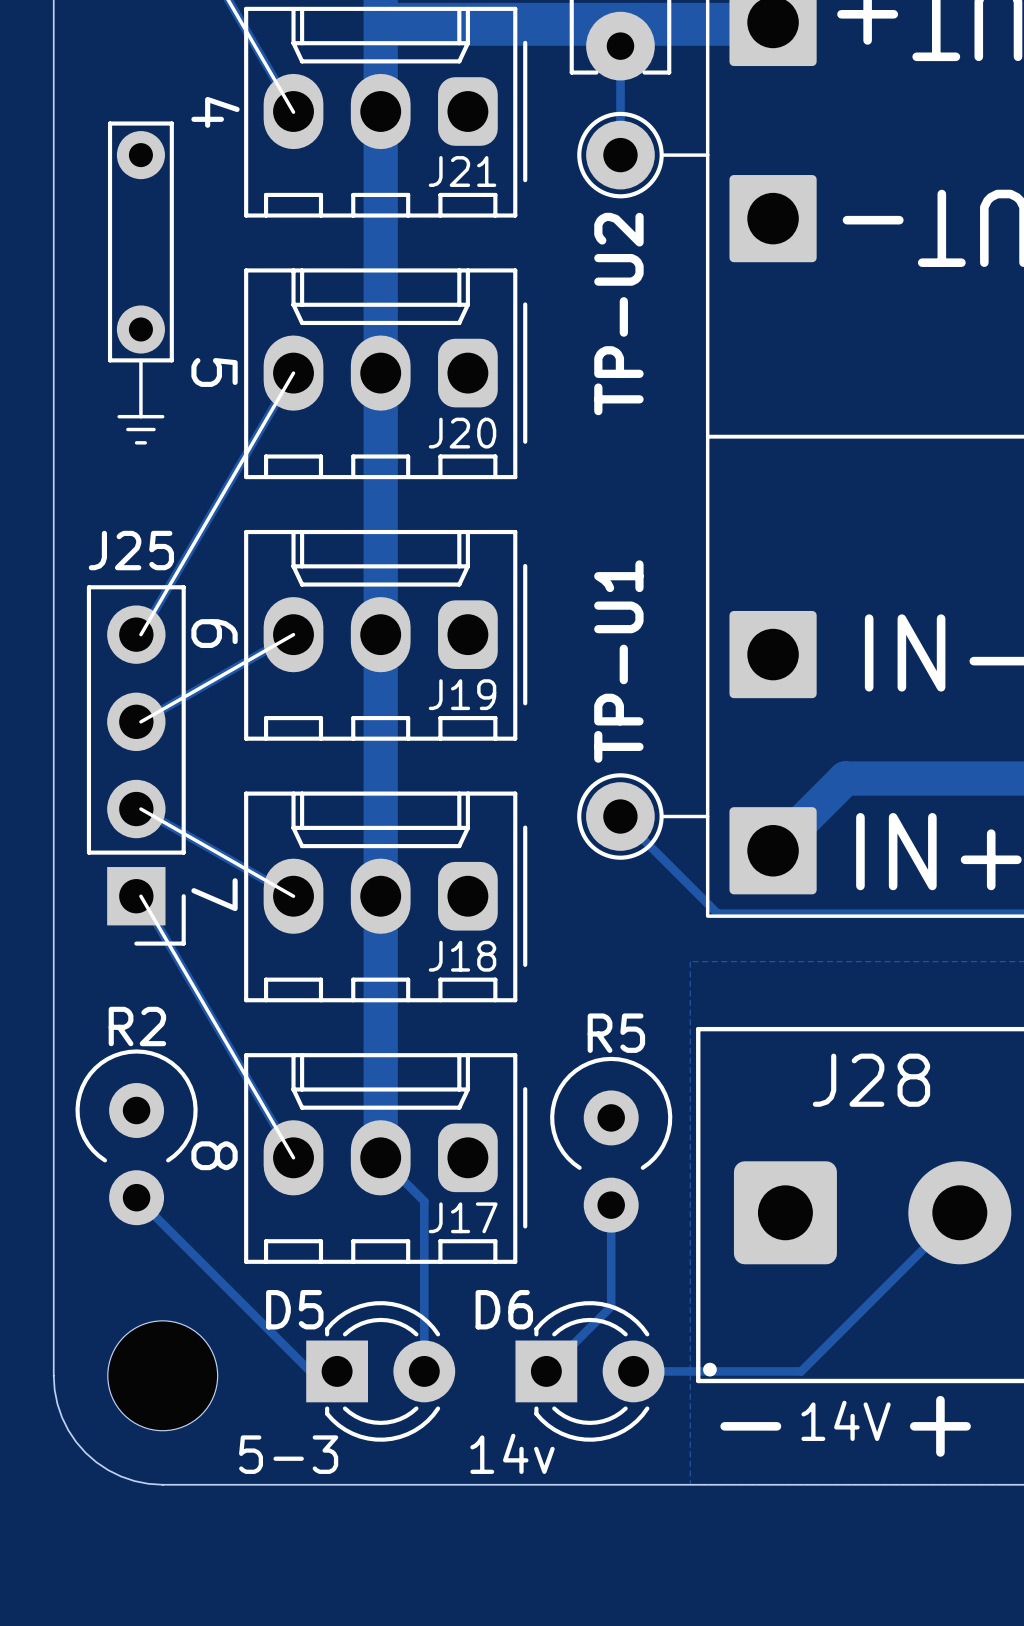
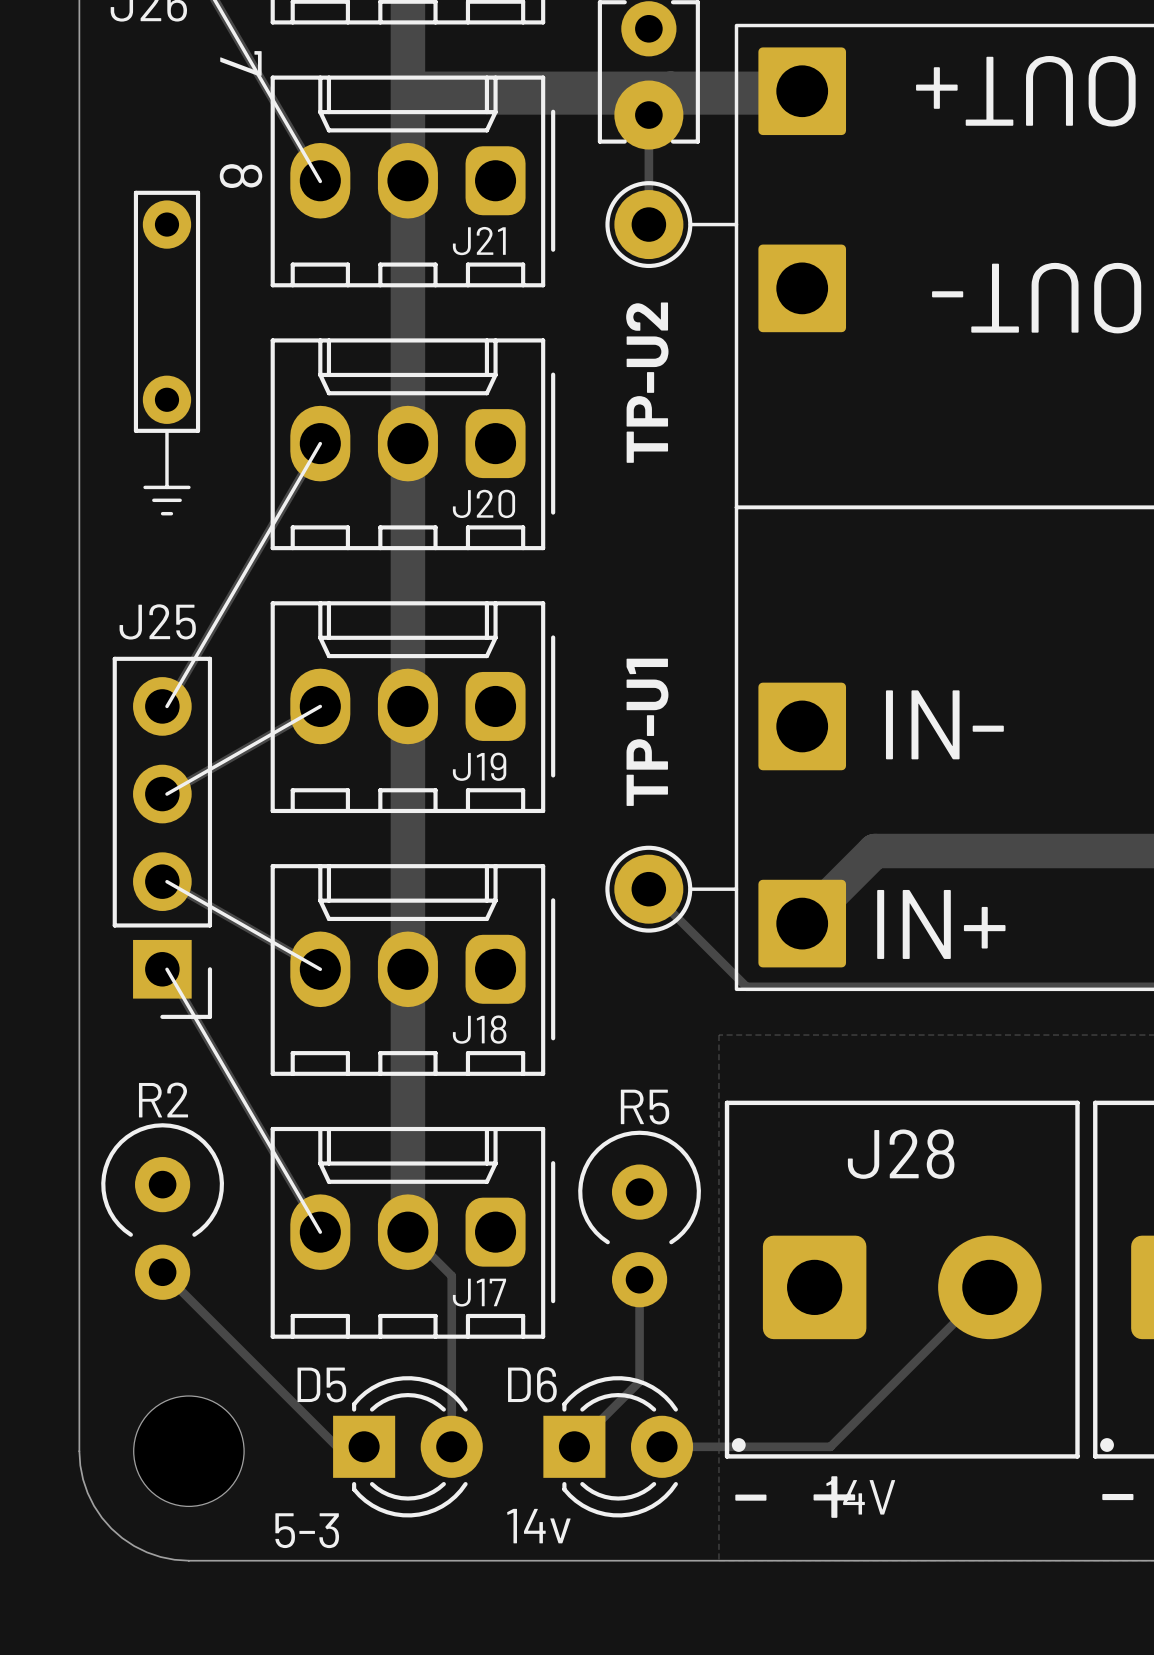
text position: 14v (512, 1453) -> 14v (538, 1526)
text position: 5-3 (288, 1454) -> 5-3 (307, 1530)

